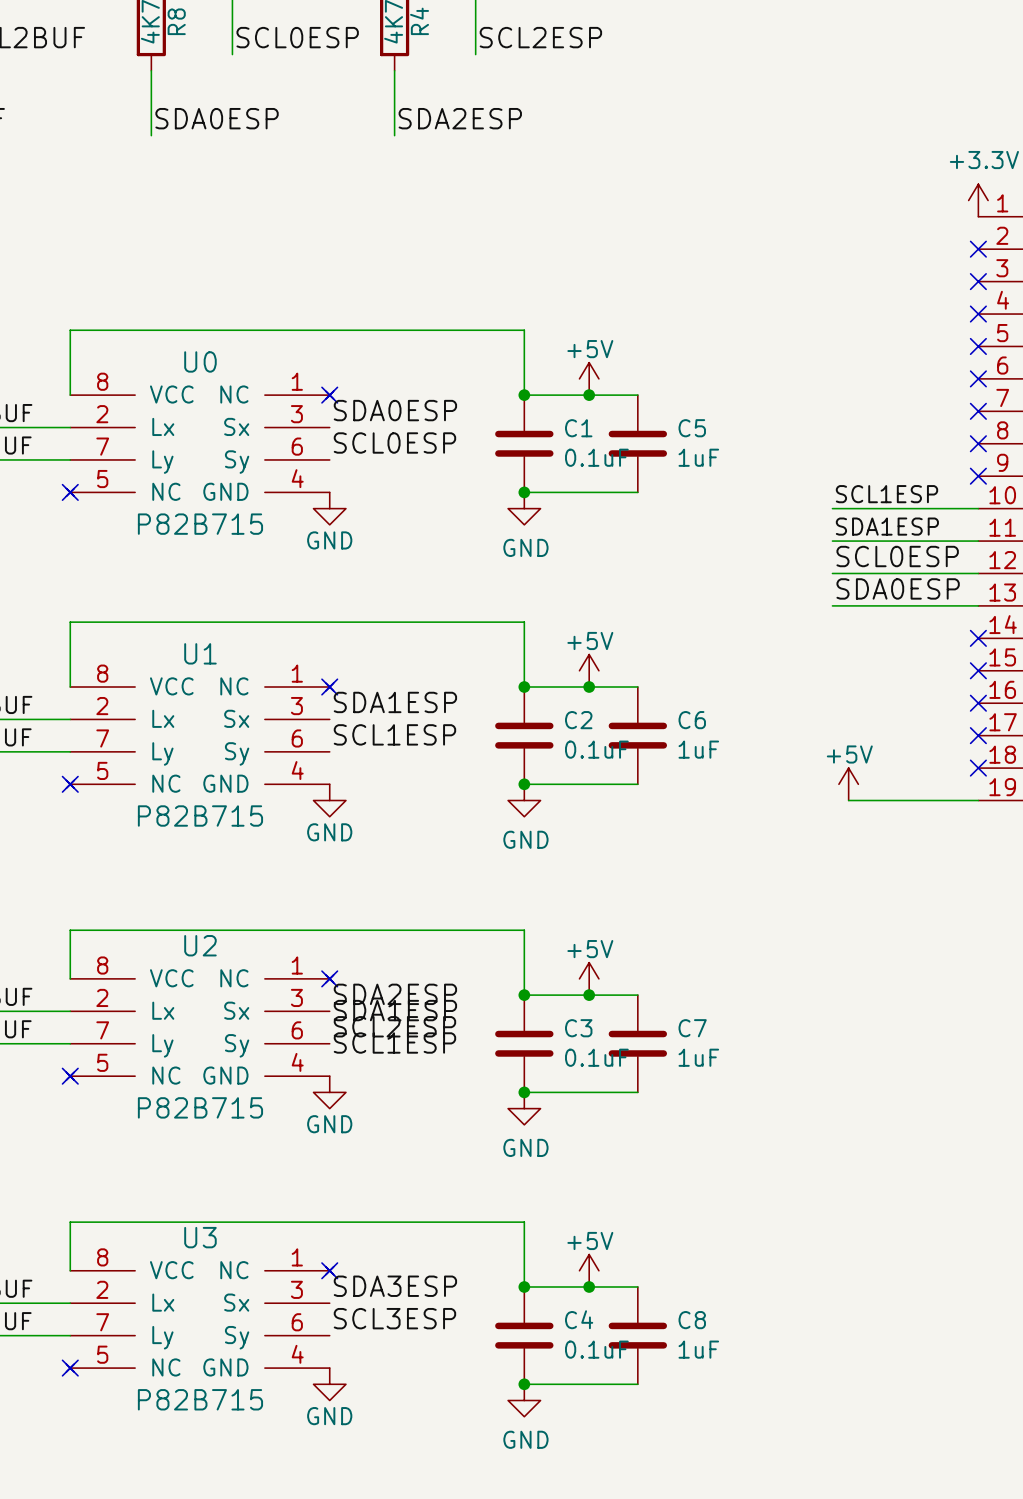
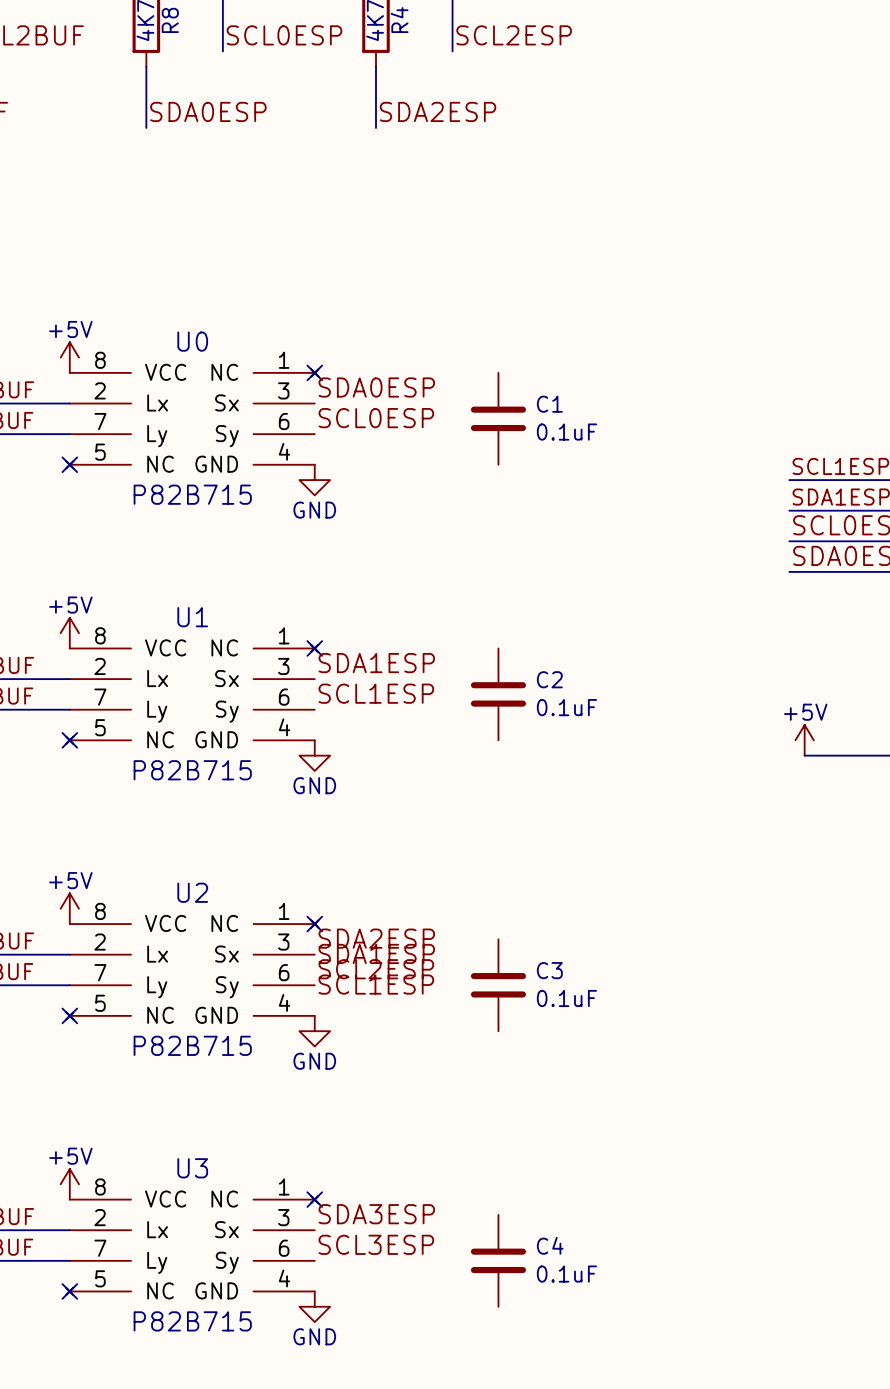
power symbol: none -> +5V (69, 357)
power symbol: +5V (589, 378) -> none
wire: (70, 395) (70, 330) (524, 330) (524, 395) (637, 395) -> none
junction: (524, 395) -> none
junction: (589, 395) -> none
C5: 1uF (637, 443) -> none
wire: (524, 492) (637, 492) -> none
junction: (524, 492) -> none
power symbol: GND (524, 508) -> none
power symbol: none -> +5V (69, 633)
power symbol: +5V (589, 670) -> none
wire: (70, 687) (70, 622) (524, 622) (524, 687) (637, 687) -> none
junction: (524, 687) -> none
junction: (589, 687) -> none
C6: 1uF (637, 735) -> none
wire: (524, 784) (637, 784) -> none
junction: (524, 784) -> none
power symbol: GND (524, 800) -> none
power symbol: none -> +5V (69, 908)
wire: (70, 978) (70, 930) (524, 930) (524, 995) (637, 995) -> none
power symbol: +5V (589, 978) -> none
junction: (524, 995) -> none
junction: (589, 995) -> none
C7: 1uF (637, 1043) -> none
wire: (524, 1092) (637, 1092) -> none
junction: (524, 1092) -> none
power symbol: GND (524, 1108) -> none
power symbol: none -> +5V (69, 1184)
wire: (70, 1270) (70, 1222) (524, 1222) (524, 1286) (637, 1286) -> none
power symbol: +5V (589, 1270) -> none
junction: (524, 1286) -> none
junction: (589, 1286) -> none
C8: 1uF (637, 1335) -> none
wire: (524, 1384) (637, 1384) -> none
junction: (524, 1384) -> none
power symbol: GND (524, 1400) -> none

